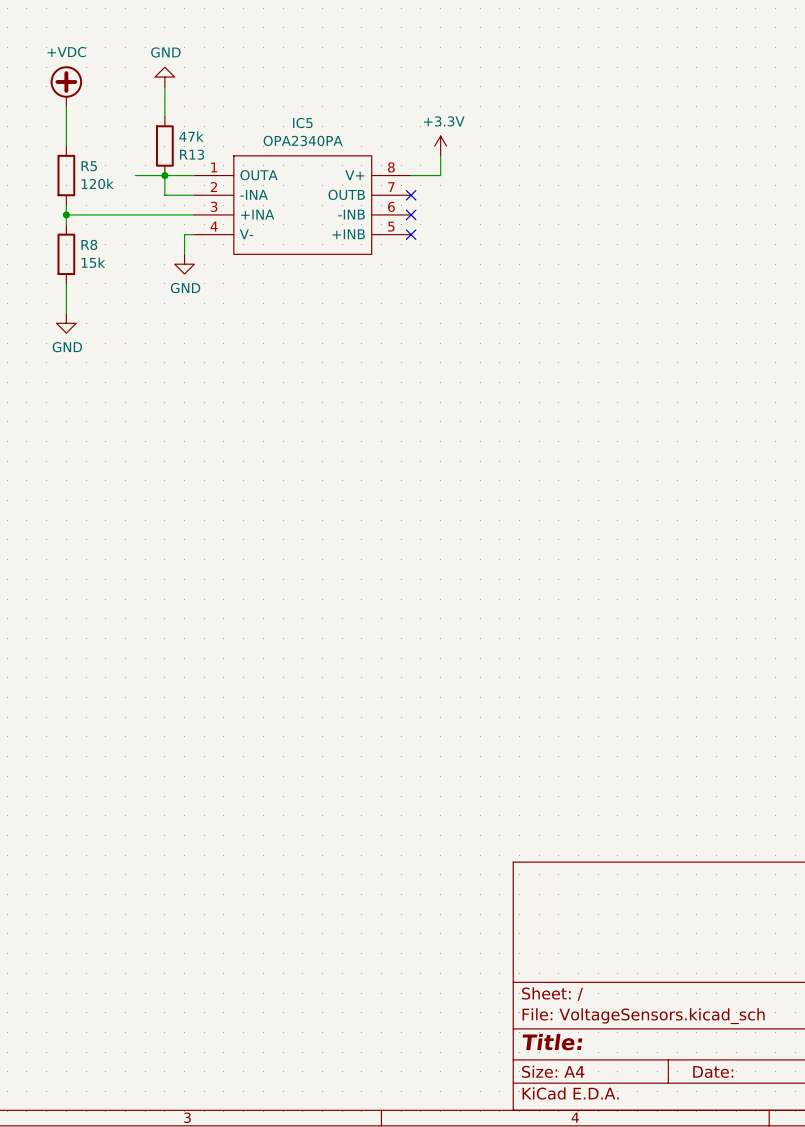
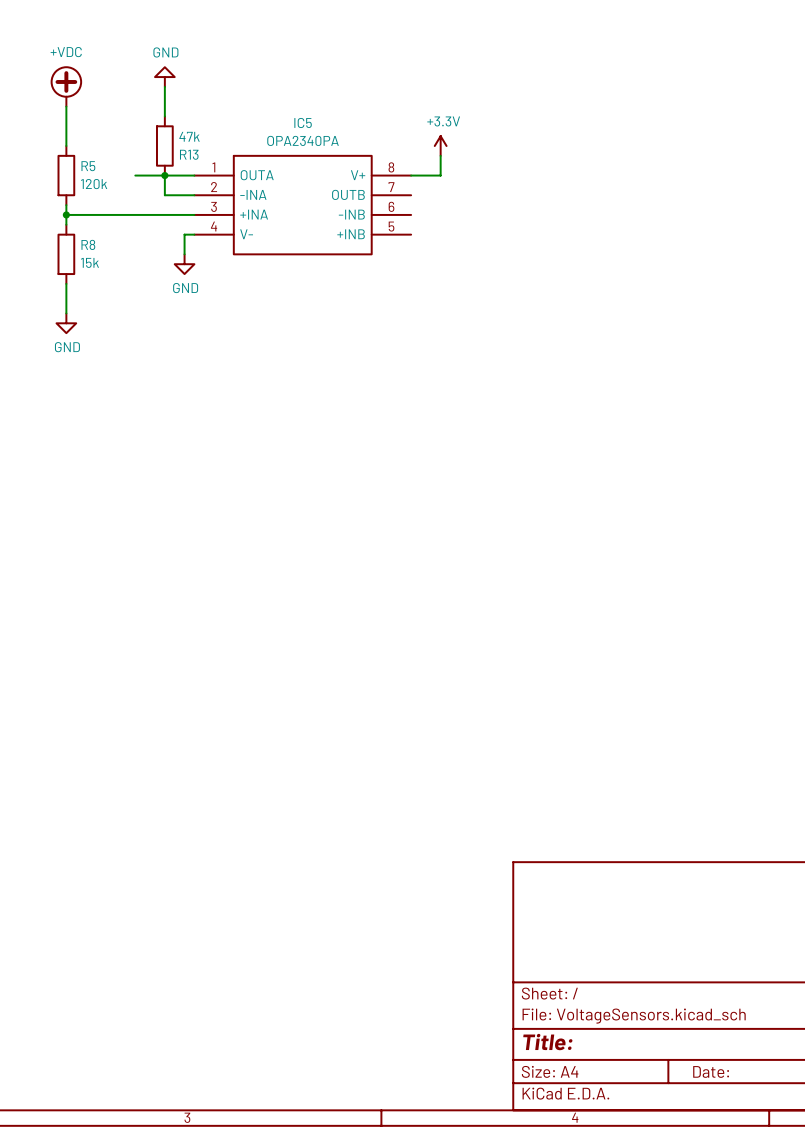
no-connect mark: (411, 195) -> none
no-connect mark: (411, 214) -> none
no-connect mark: (411, 234) -> none

